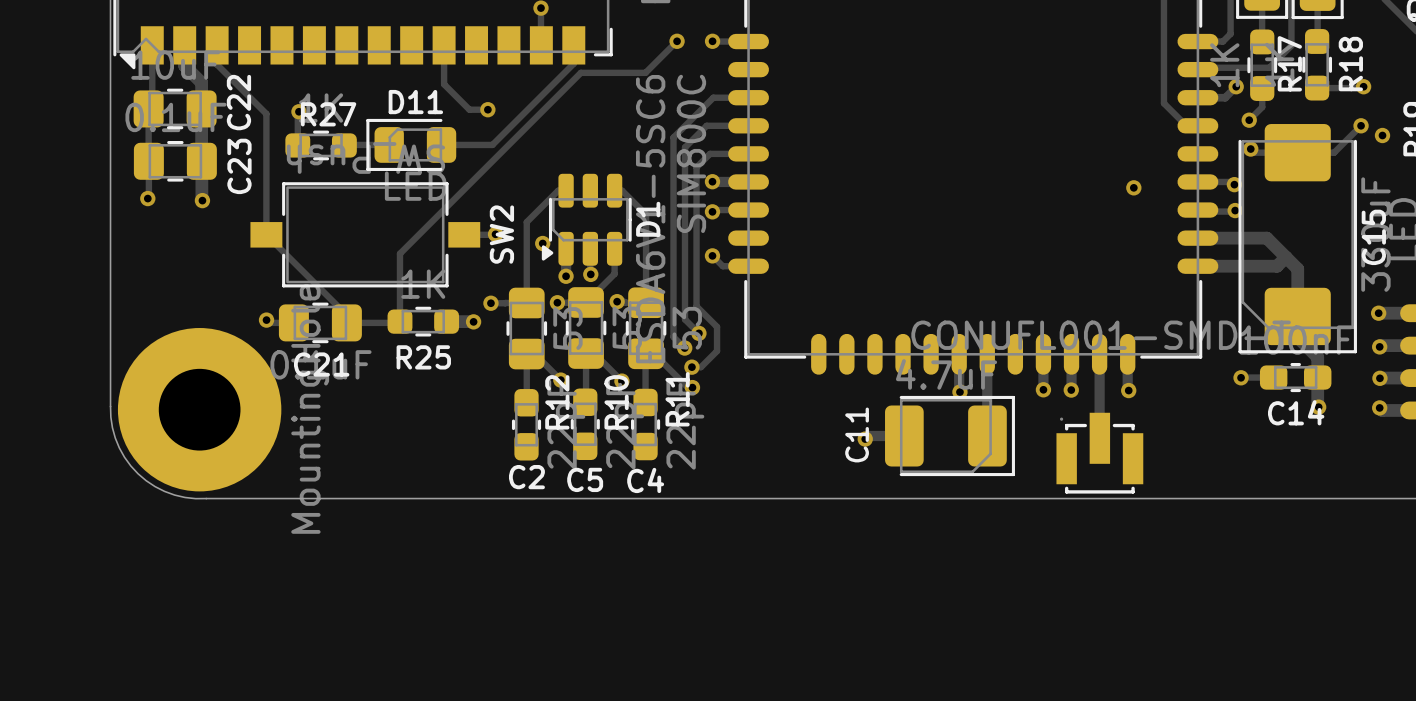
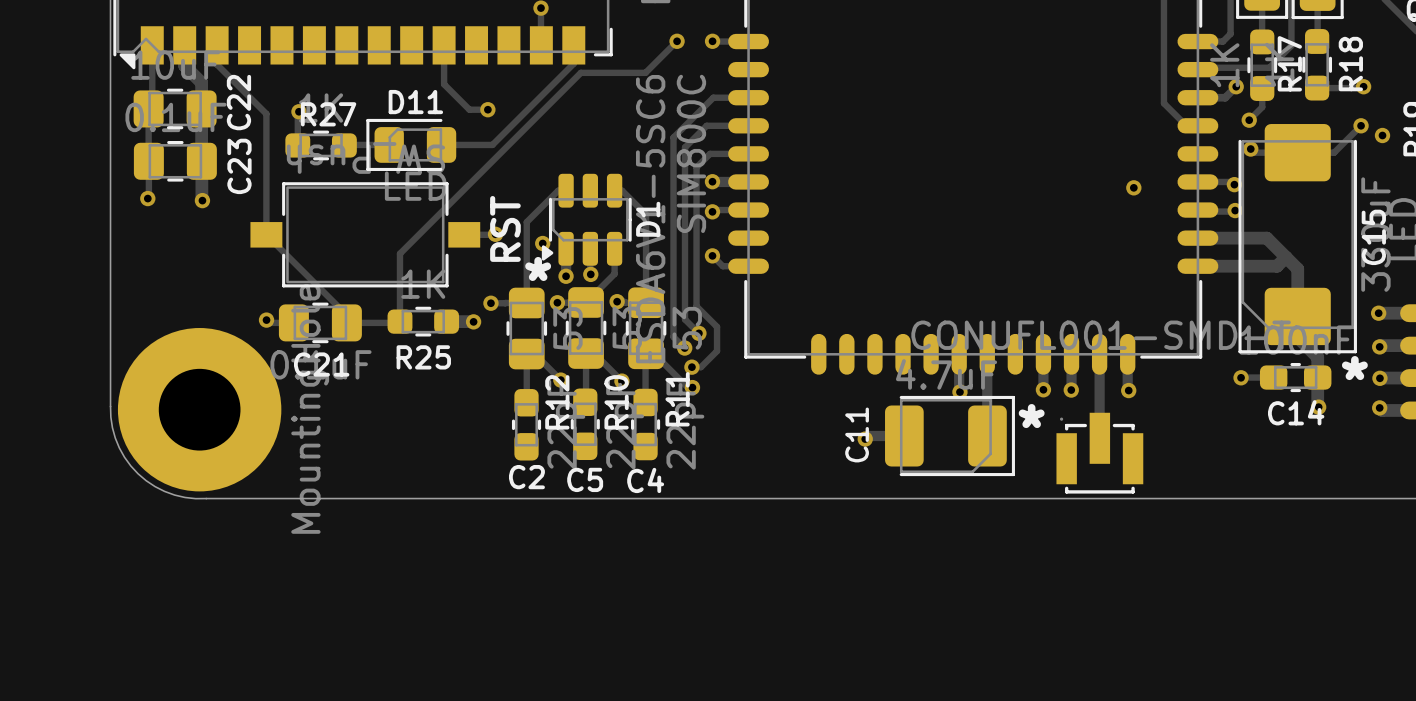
text: none -> RST (505, 228)
SW2 name: SW2 (501, 234) -> none
text: none -> * (538, 268)
text: none -> * (1354, 368)
text: none -> * (1031, 416)

